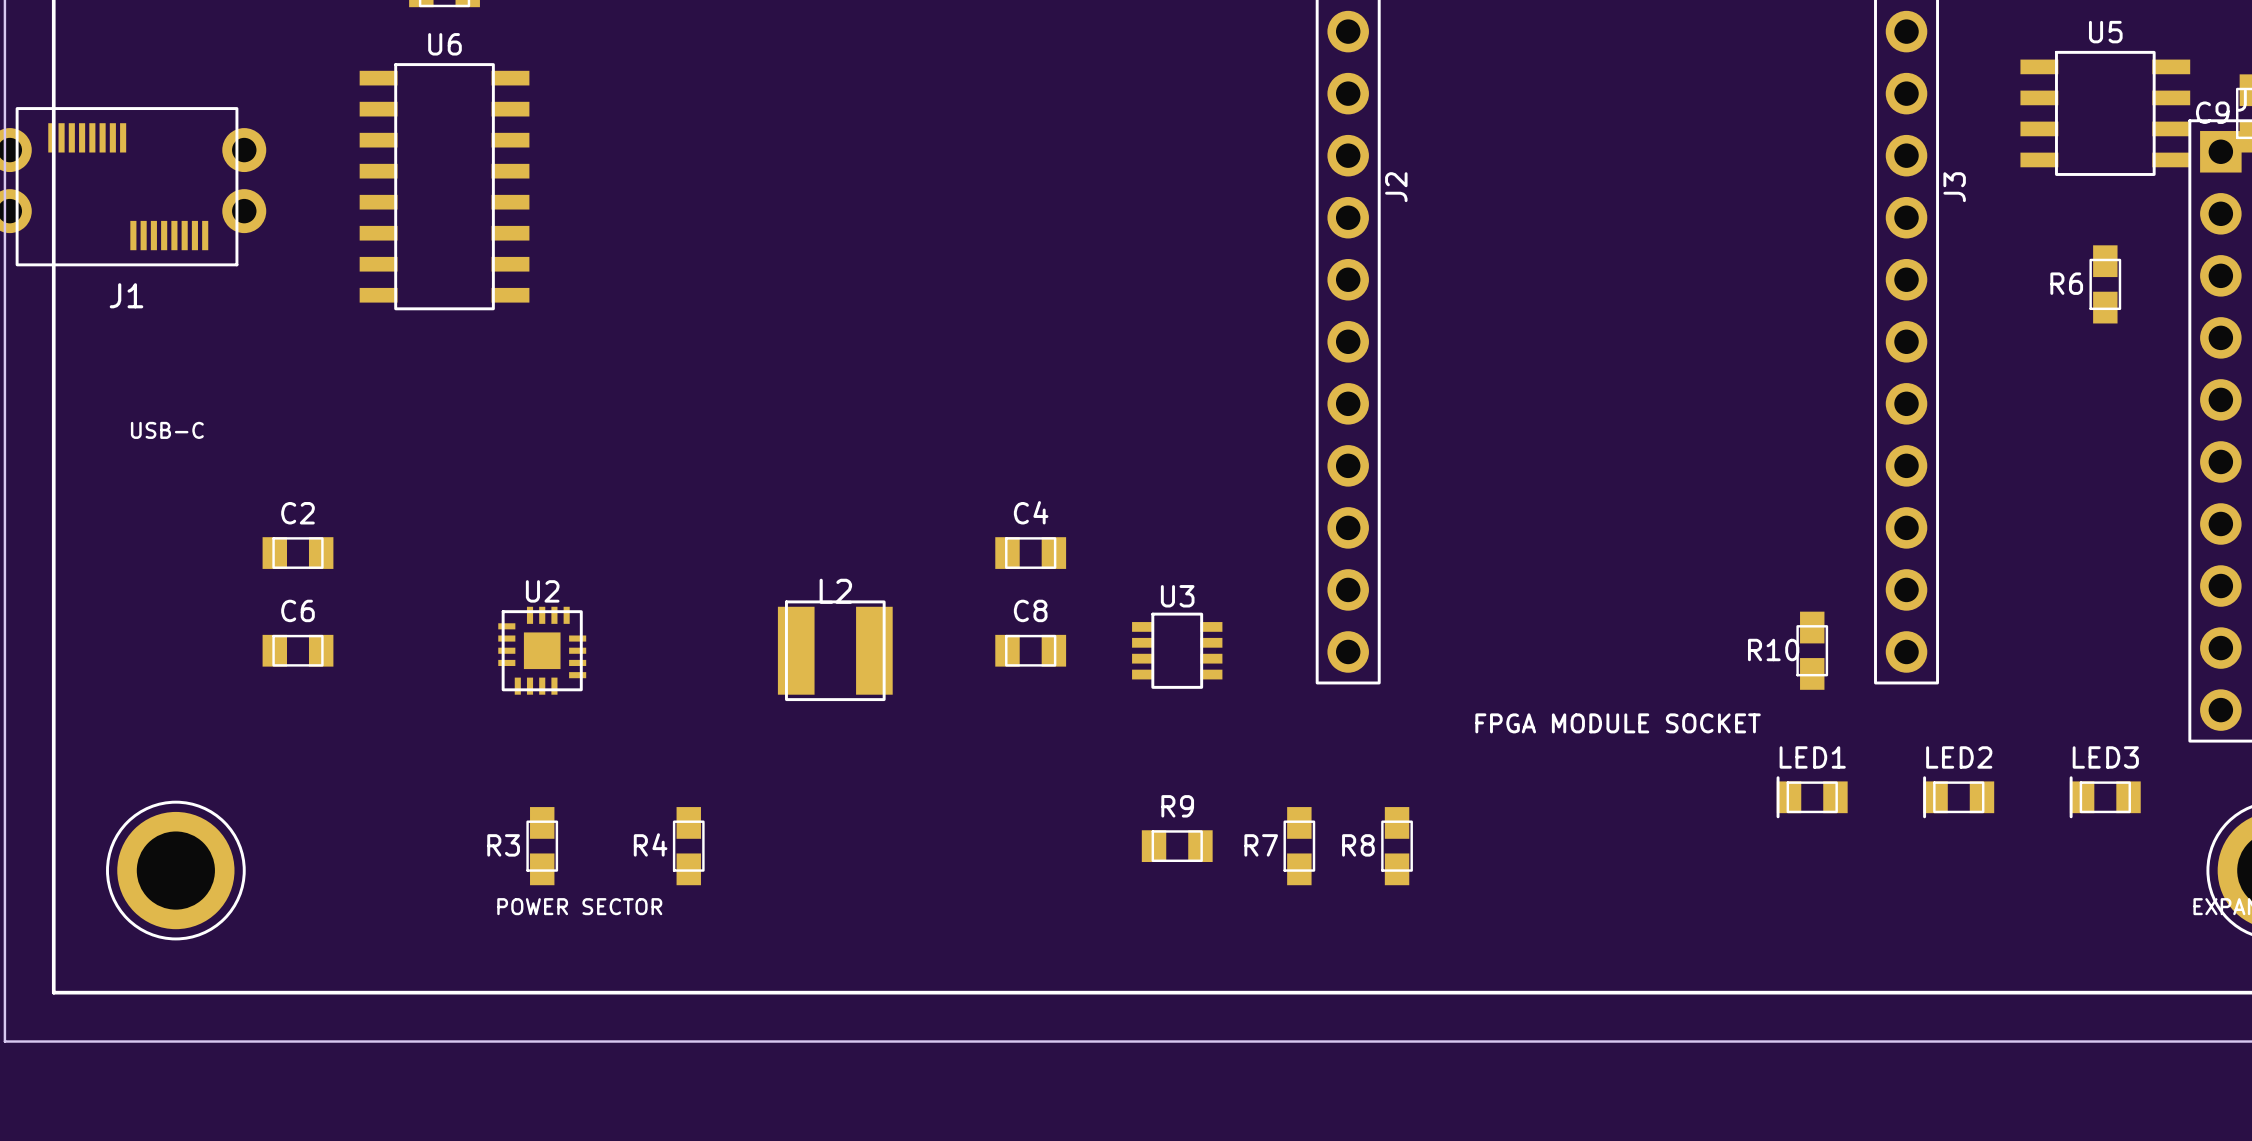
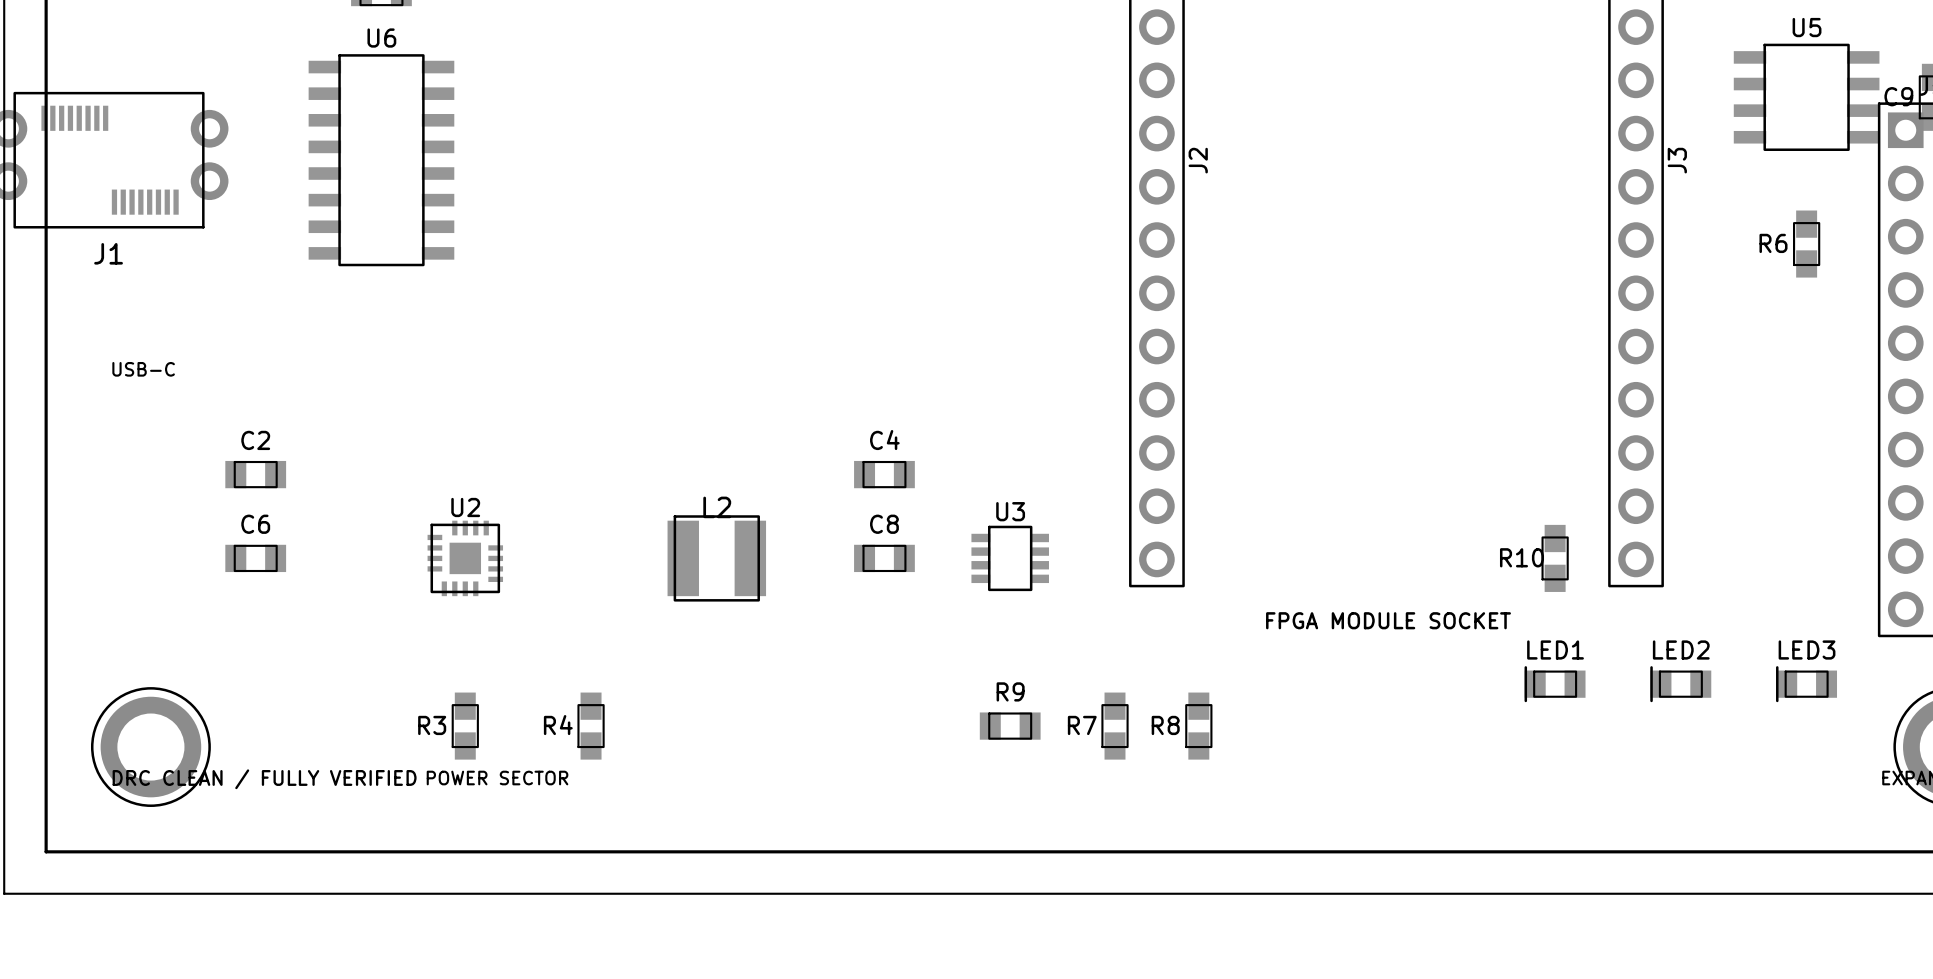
text: none -> DRC CLEAN / FULLY VERIFIED (264, 779)

